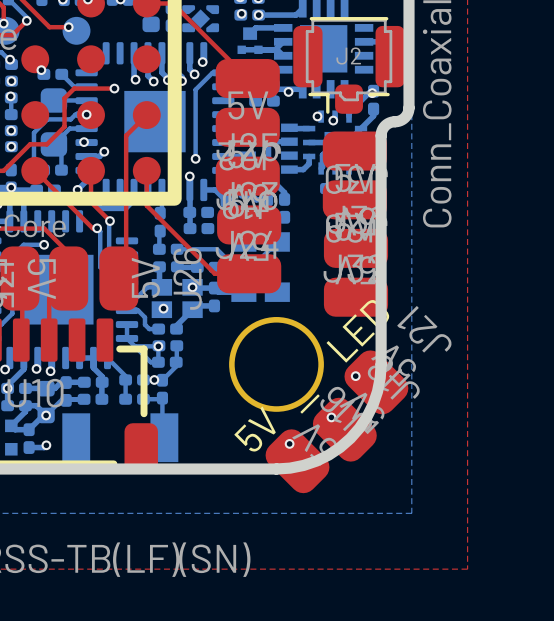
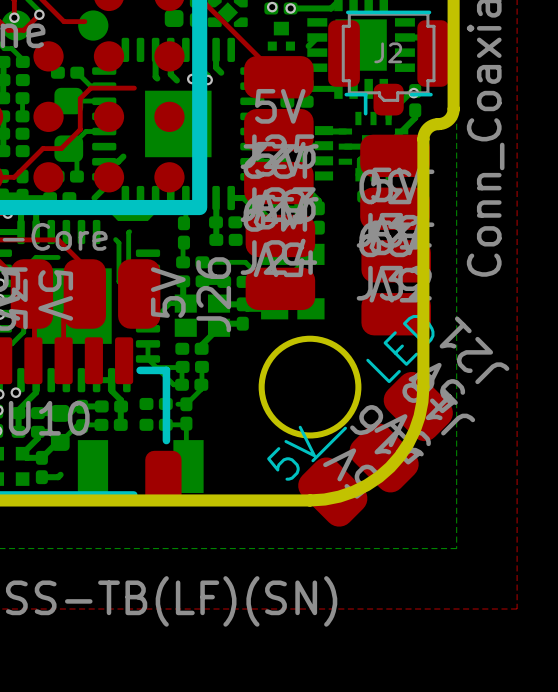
via: (68, 27) -> none
bottom track: (283, 27) (255, 27) (250, 33) -> none
bottom track: (241, 49) (277, 49) (283, 55) -> none
bottom track: (161, 53) (161, 72) (167, 80) -> none
via: (10, 59) -> none
via: (202, 62) -> none
via: (41, 70) -> none
bottom track: (223, 72) (212, 72) (195, 89) (195, 158) -> none
via: (194, 74) -> none
via: (135, 79) -> none
via: (11, 81) -> none
via: (153, 81) -> none
via: (114, 88) -> none
via: (288, 91) -> none
via: (10, 96) -> none
bottom track: (86, 114) (75, 114) (70, 119) (47, 119) (33, 132) (33, 160) (43, 170) -> none
via: (86, 114) -> none
top track: (146, 115) (126, 135) (126, 271) (118, 278) -> none
via: (317, 116) -> none
via: (333, 120) -> none
via: (11, 130) -> none
via: (84, 142) -> none
via: (11, 146) -> none
via: (104, 151) -> none
bottom track: (309, 156) (309, 163) (303, 169) (289, 169) -> none
via: (195, 158) -> none
top track: (35, 170) (92, 228) (97, 228) -> none
top track: (91, 170) (91, 202) (109, 221) -> none
top track: (146, 170) (146, 205) (214, 273) (249, 273) -> none
via: (189, 176) -> none
via: (11, 187) -> none
via: (77, 189) -> none
via: (109, 221) -> none
via: (97, 228) -> none
via: (44, 244) -> none
via: (192, 287) -> none
via: (163, 308) -> none
bottom track: (127, 310) (138, 310) (144, 317) (144, 324) (149, 329) (158, 329) -> none
via: (158, 346) -> none
bottom track: (107, 358) (125, 376) (125, 399) -> none
via: (36, 368) -> none
via: (50, 371) -> none
via: (355, 376) -> none
via: (154, 379) -> none
via: (7, 388) -> none
via: (46, 415) -> none
via: (331, 417) -> none
via: (289, 443) -> none
via: (46, 445) -> none

